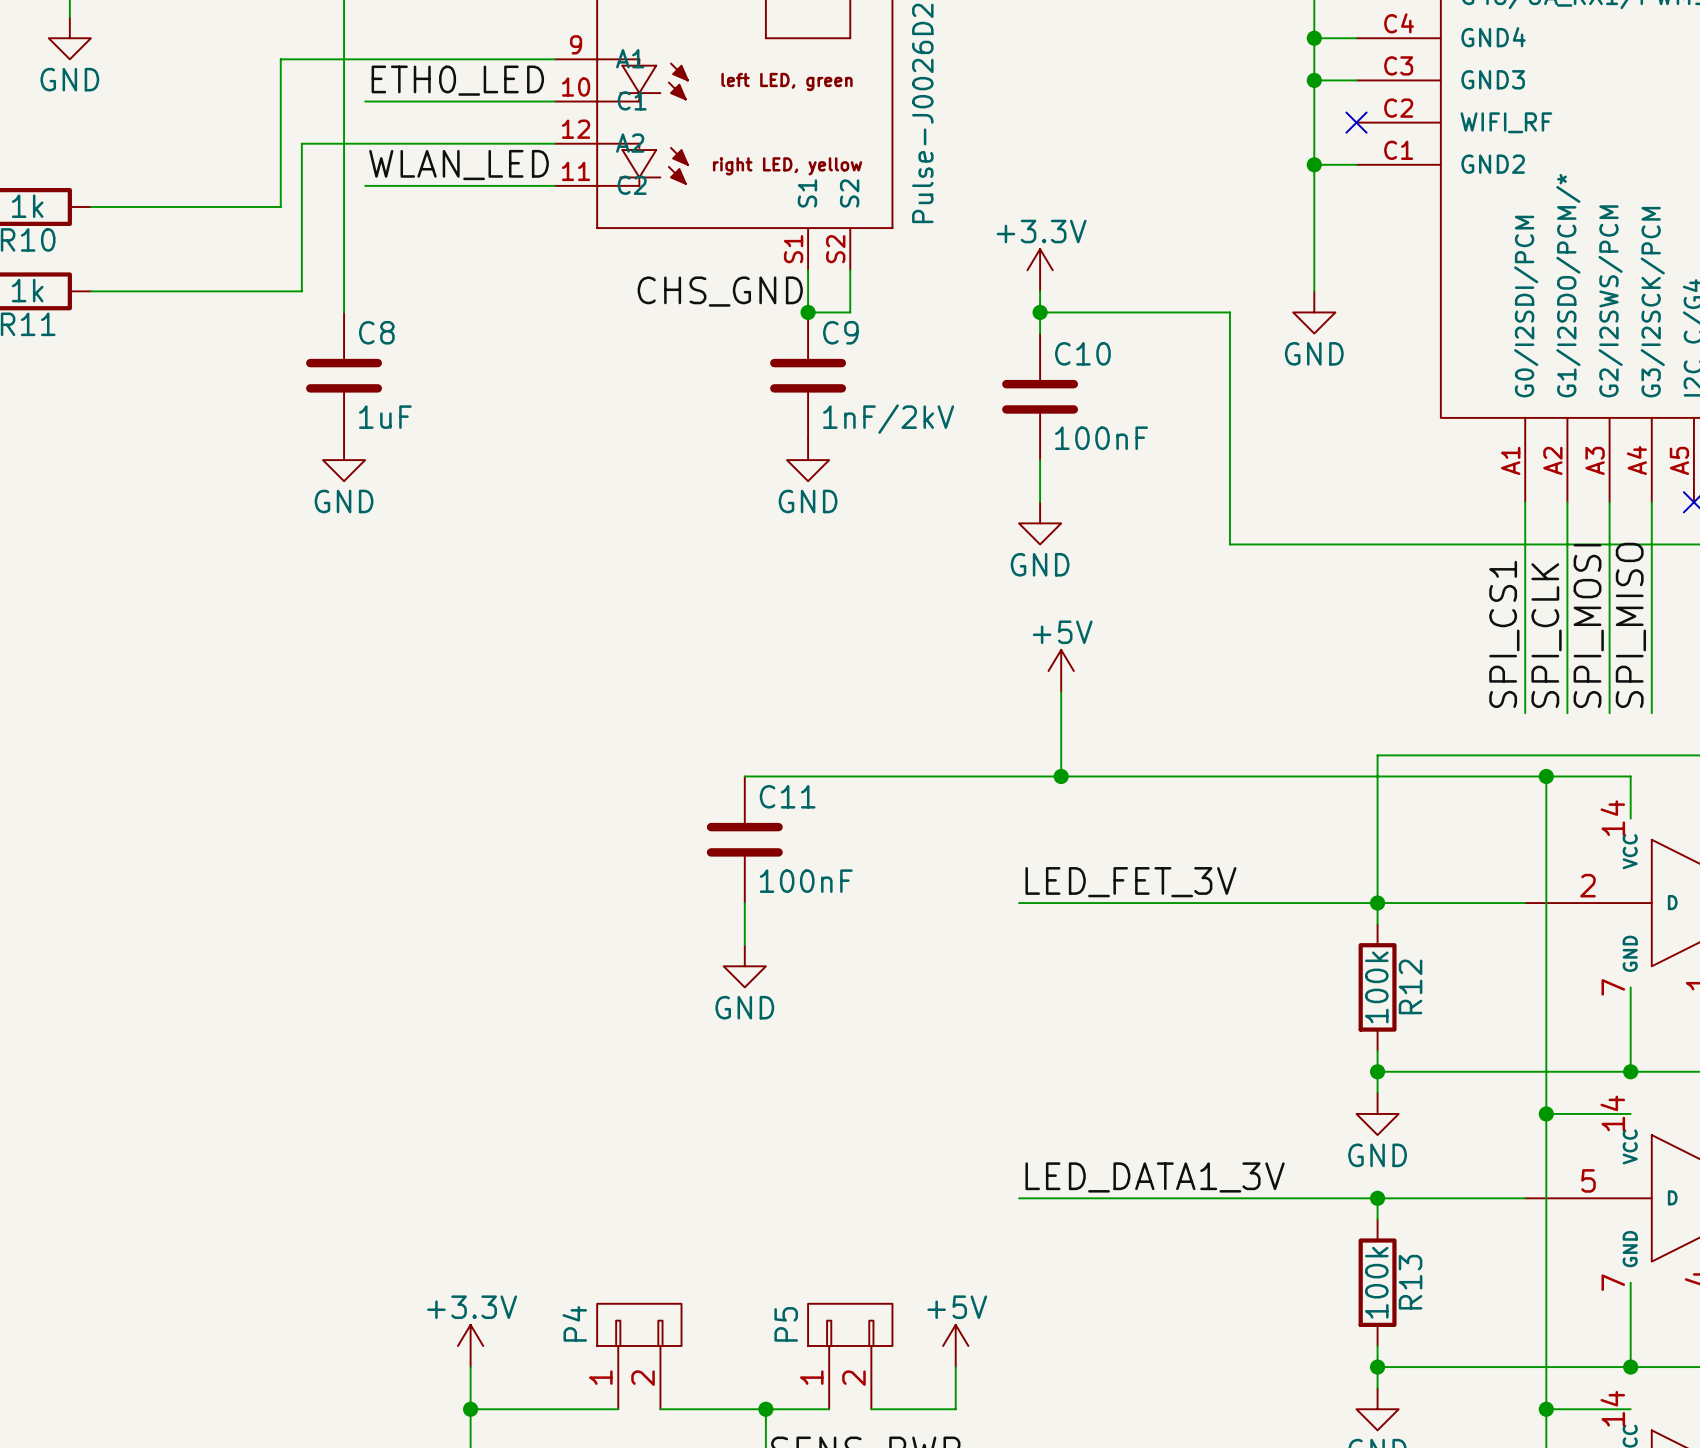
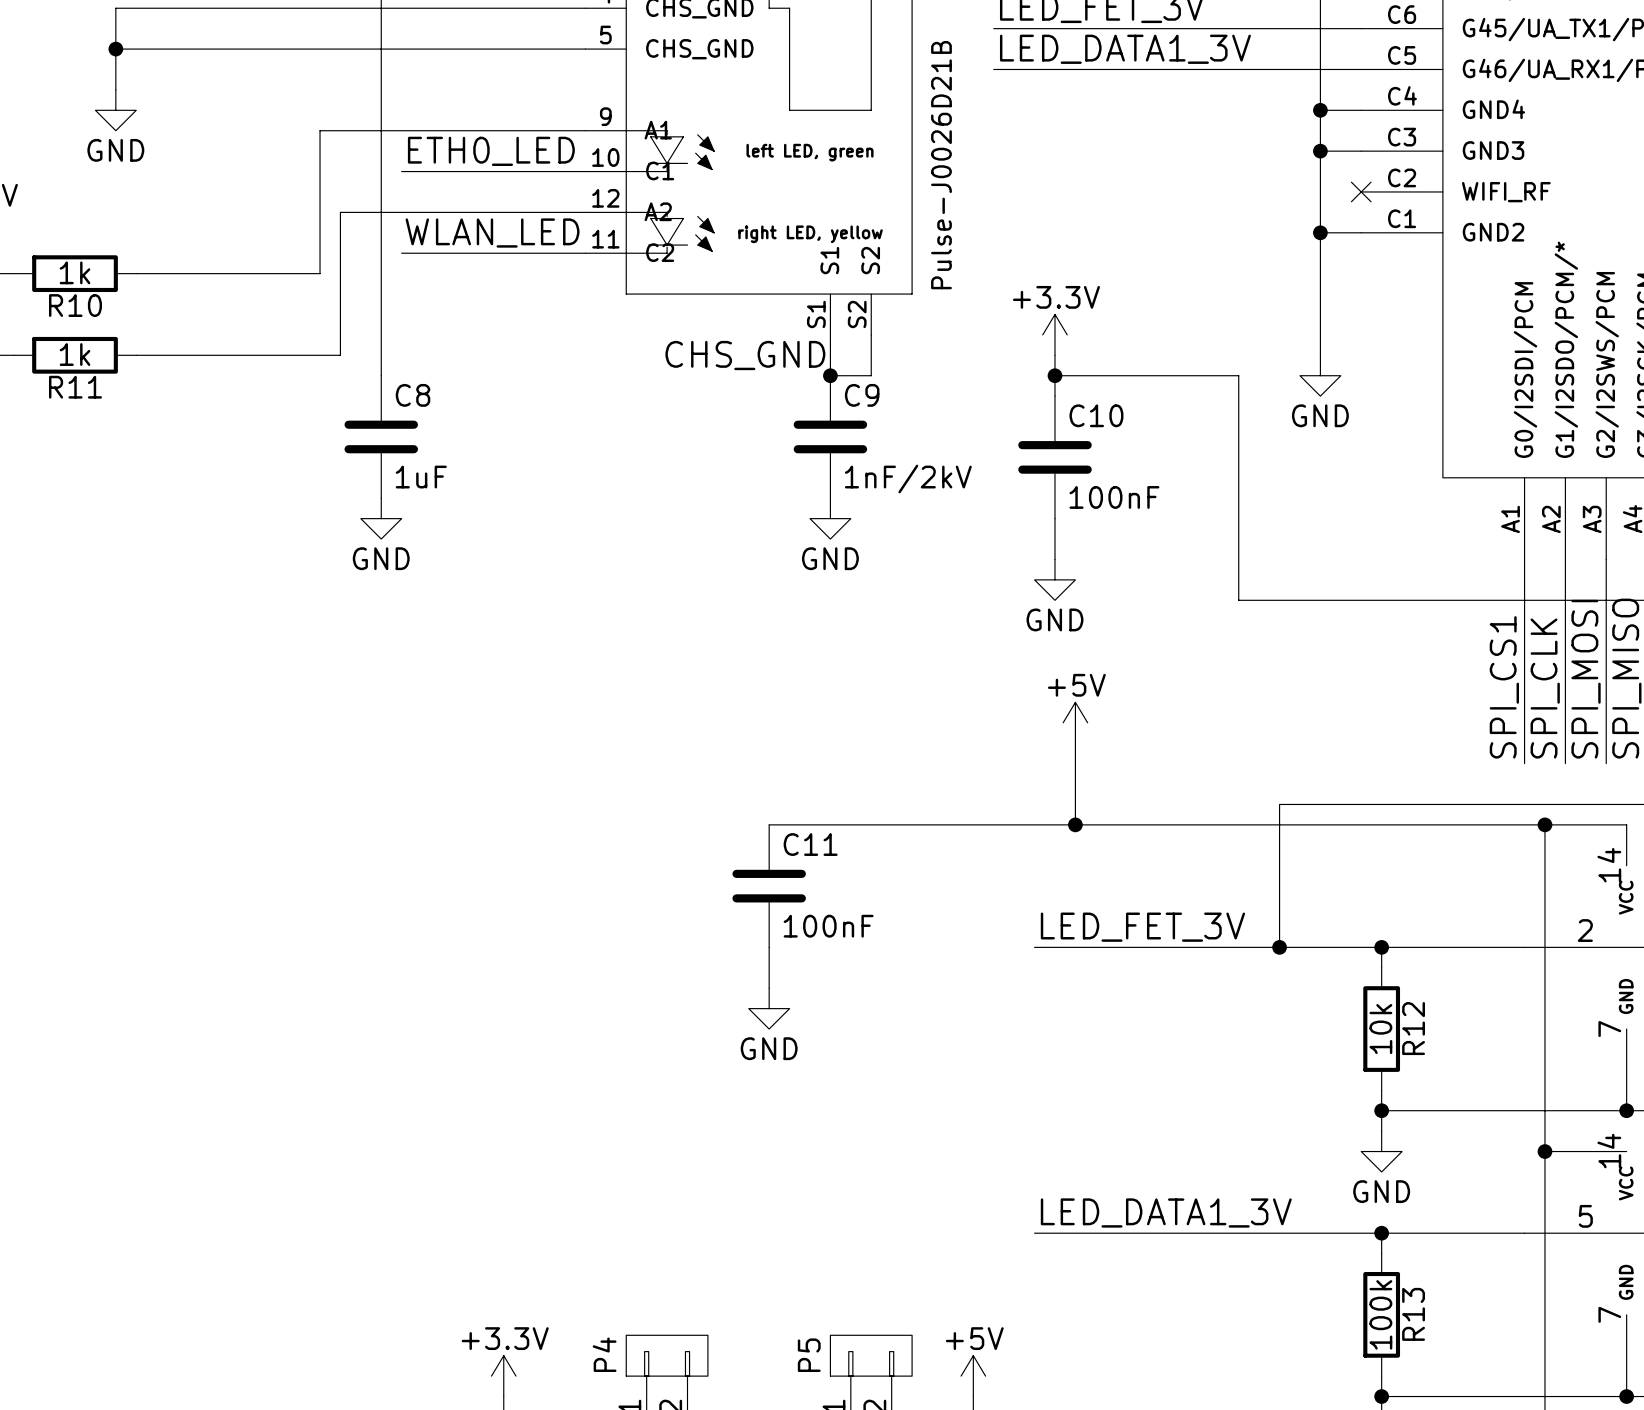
wire: (1377, 755) (1377, 903) -> (1381, 804) (1279, 804) (1279, 947)
junction: none -> (1279, 947)
R12 value: 100k (1376, 987) -> 10k (1380, 1029)

